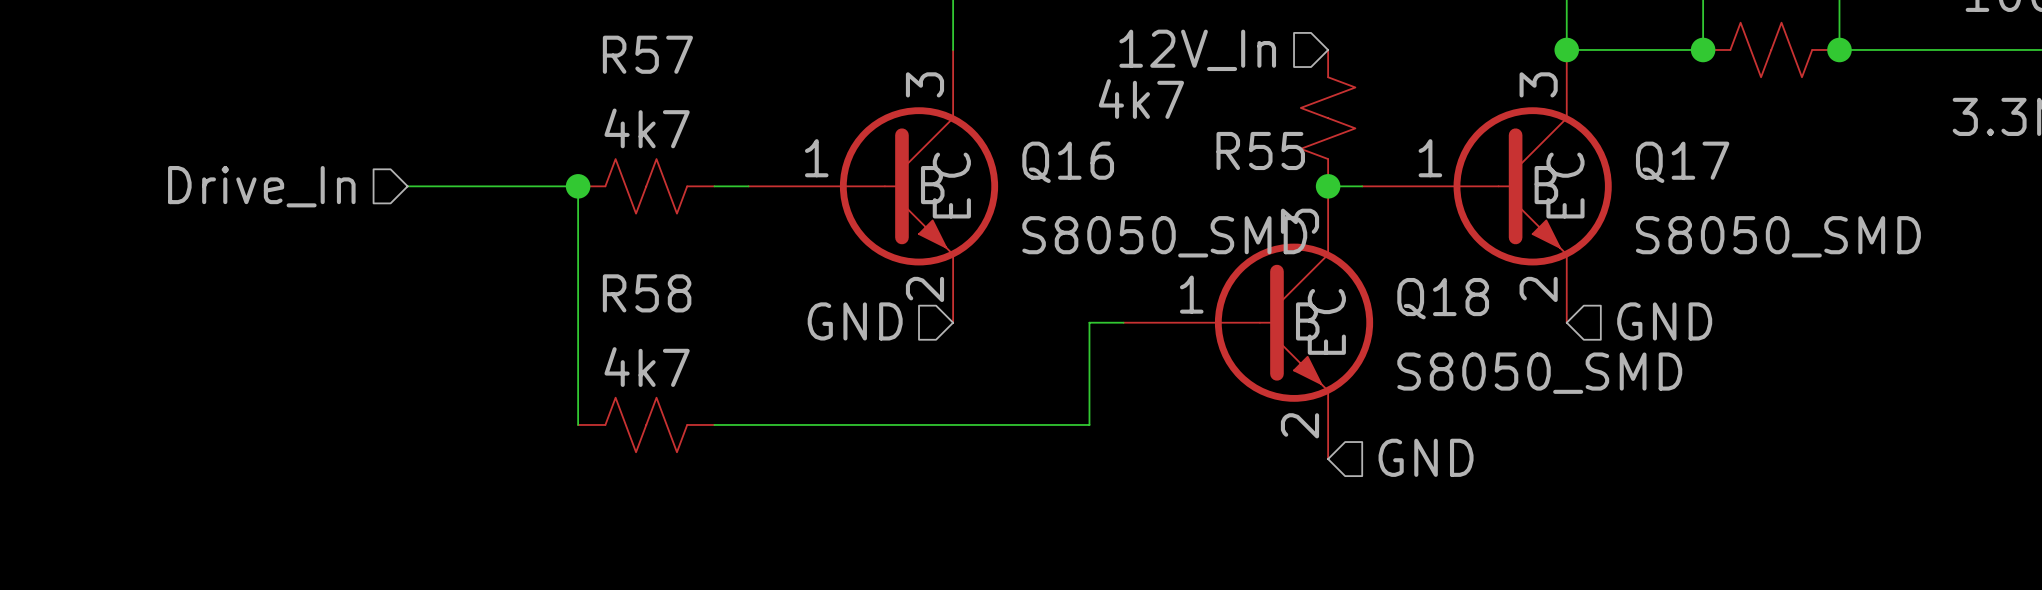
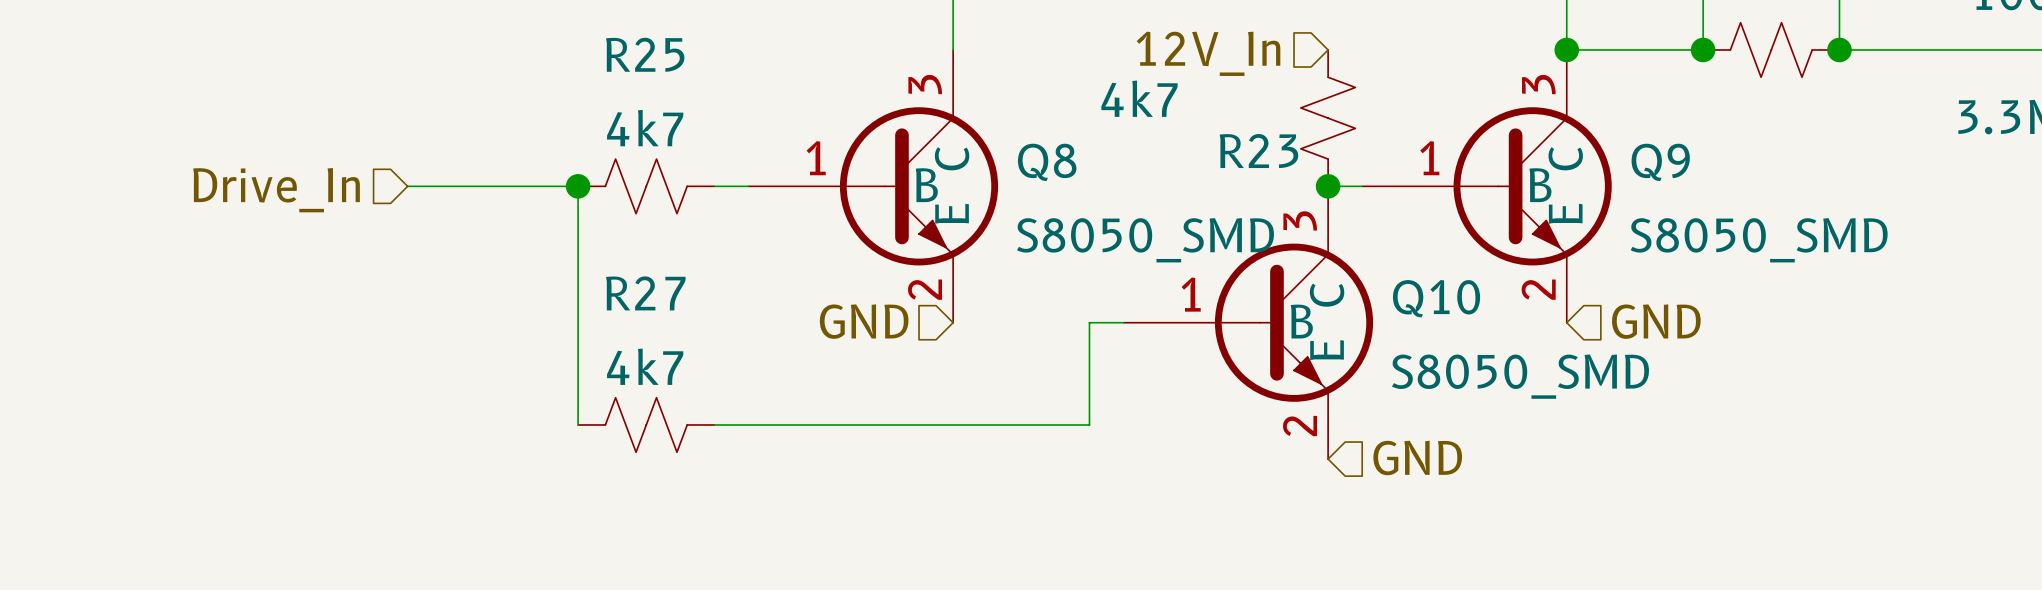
R57 name: R57 (647, 54) -> R25 (645, 54)
R55 name: R55 (1260, 150) -> R23 (1258, 151)
Q16 name: Q16 (1068, 162) -> Q8 (1047, 162)
Q17 name: Q17 (1682, 162) -> Q9 (1660, 162)
R58 name: R58 (647, 293) -> R27 (645, 293)
Q18 name: Q18 (1443, 298) -> Q10 (1436, 298)

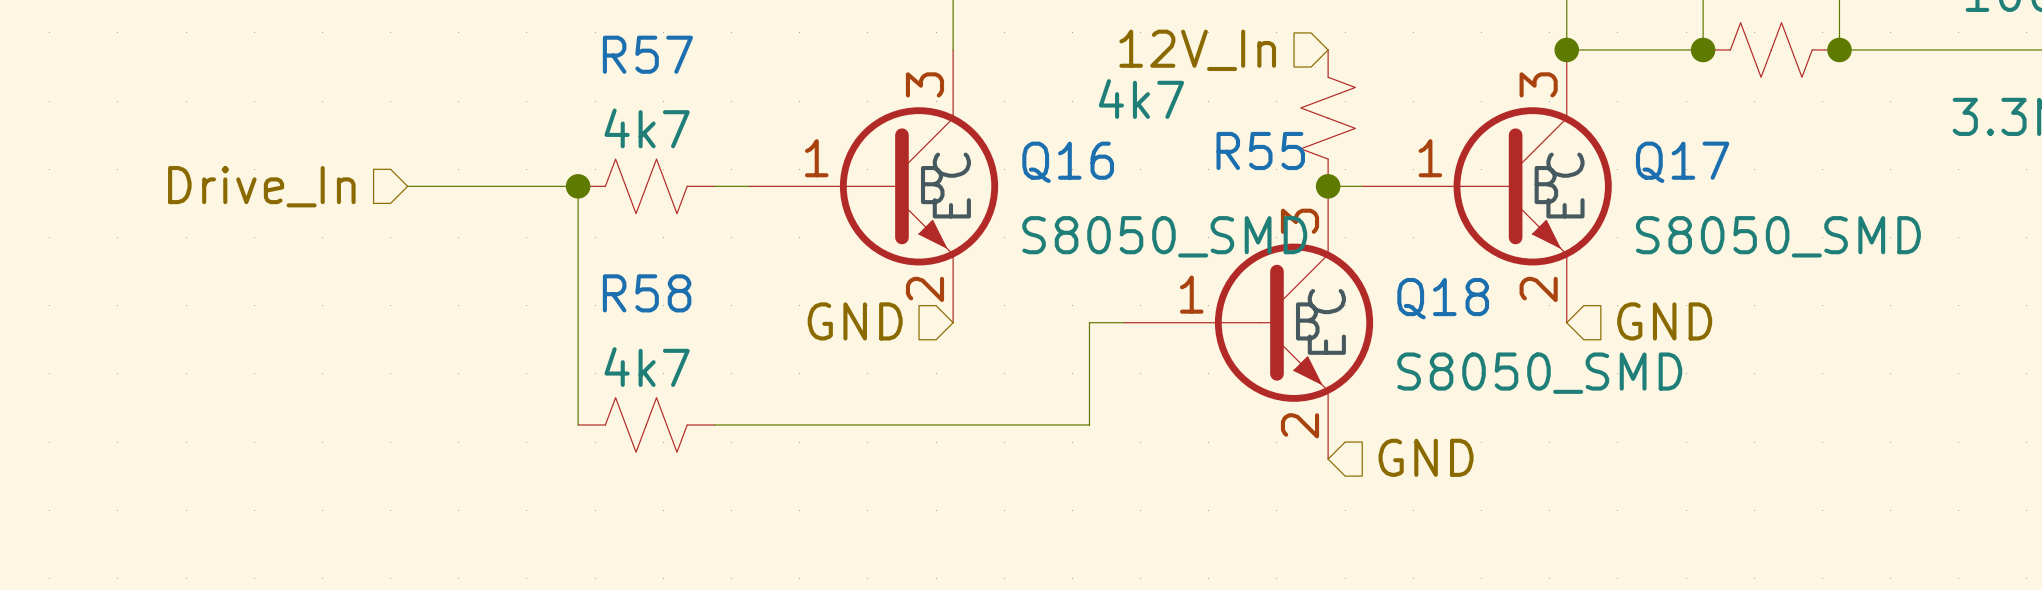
R25 name: R25 (645, 54) -> R57 (647, 54)
R23 name: R23 (1258, 151) -> R55 (1260, 150)
Q8 name: Q8 (1047, 162) -> Q16 (1068, 162)
Q9 name: Q9 (1660, 162) -> Q17 (1682, 162)
R27 name: R27 (645, 293) -> R58 (647, 293)
Q10 name: Q10 (1436, 298) -> Q18 (1443, 298)

